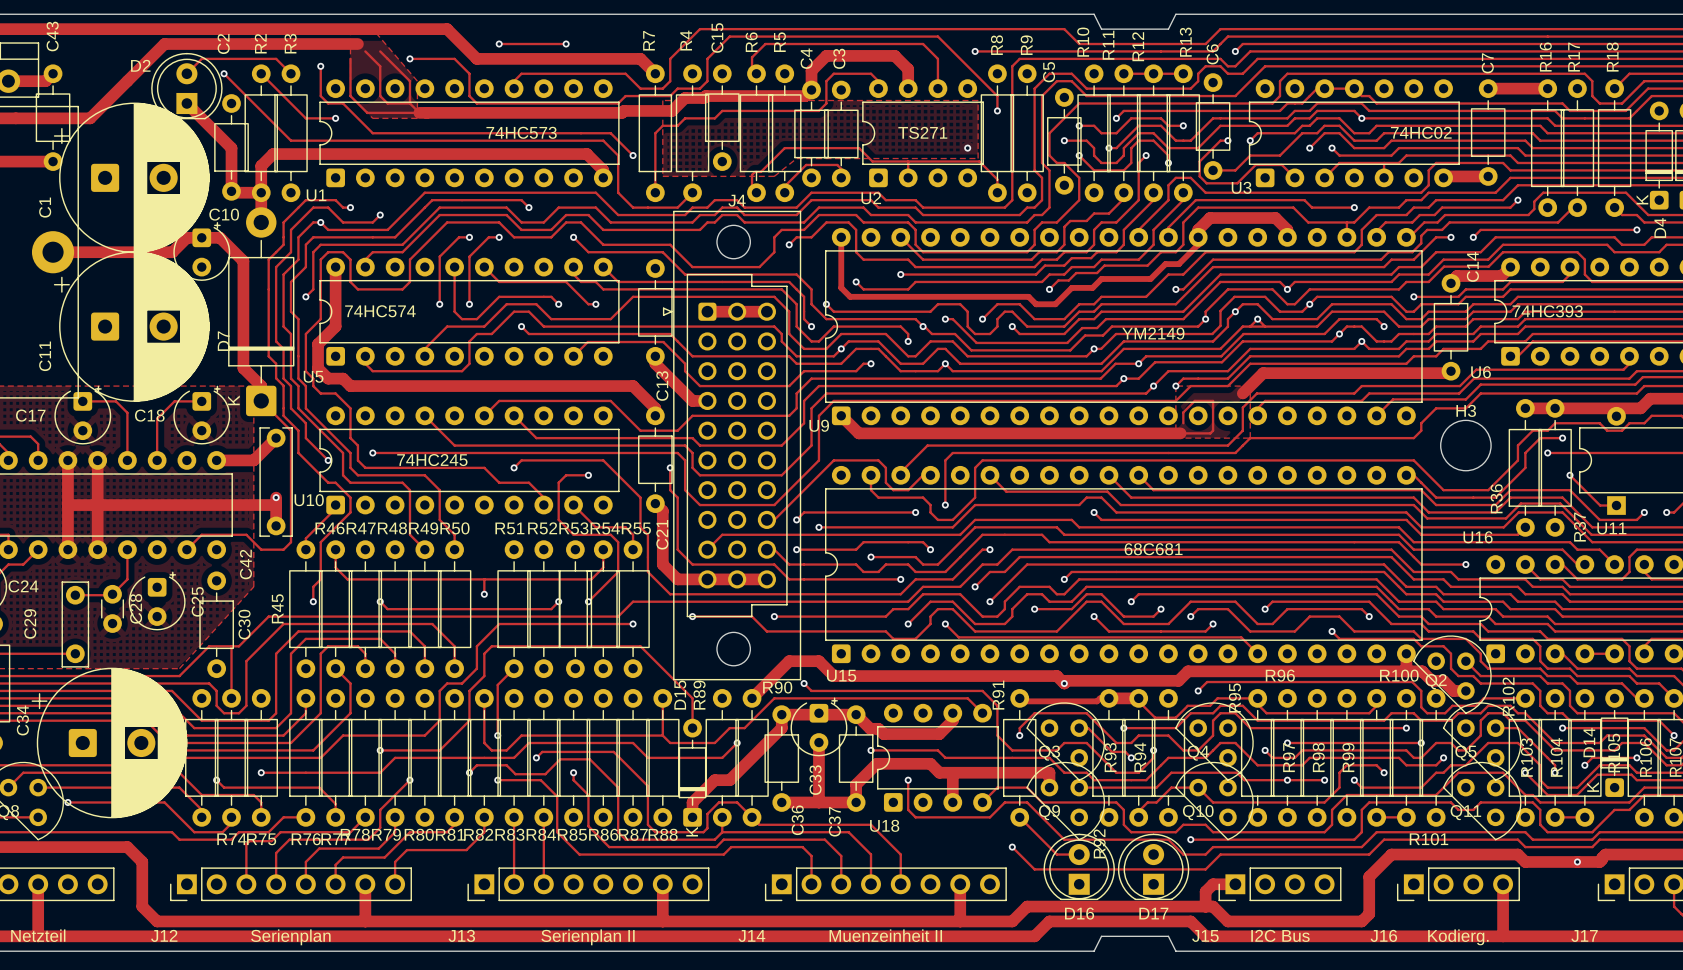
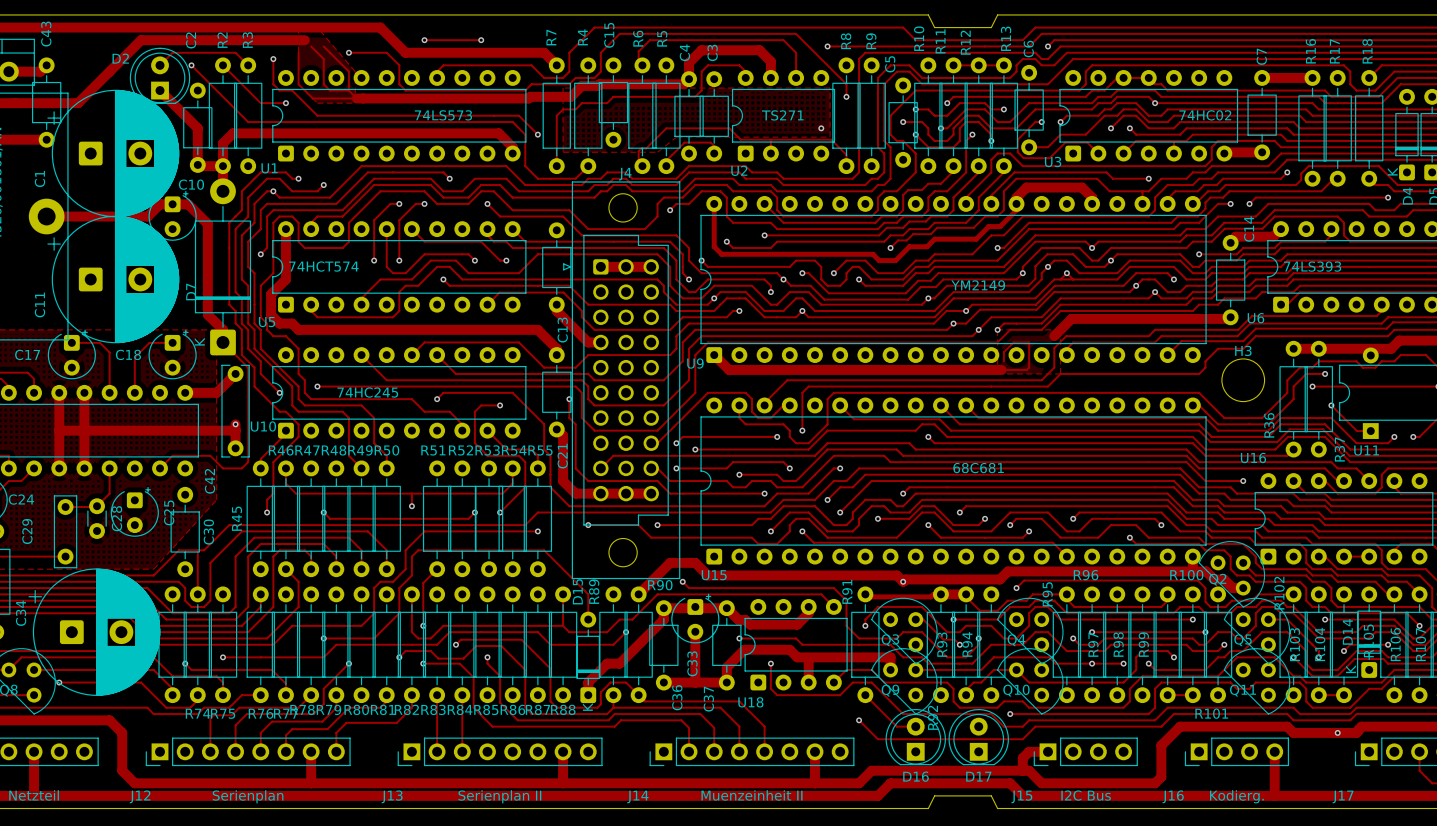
U1 value: 74HC573 (521, 132) -> 74LS573 (443, 115)
U5 value: 74HC574 (380, 311) -> 74HCT574 (323, 266)
U6 value: 74HC393 (1547, 311) -> 74LS393 (1312, 266)

